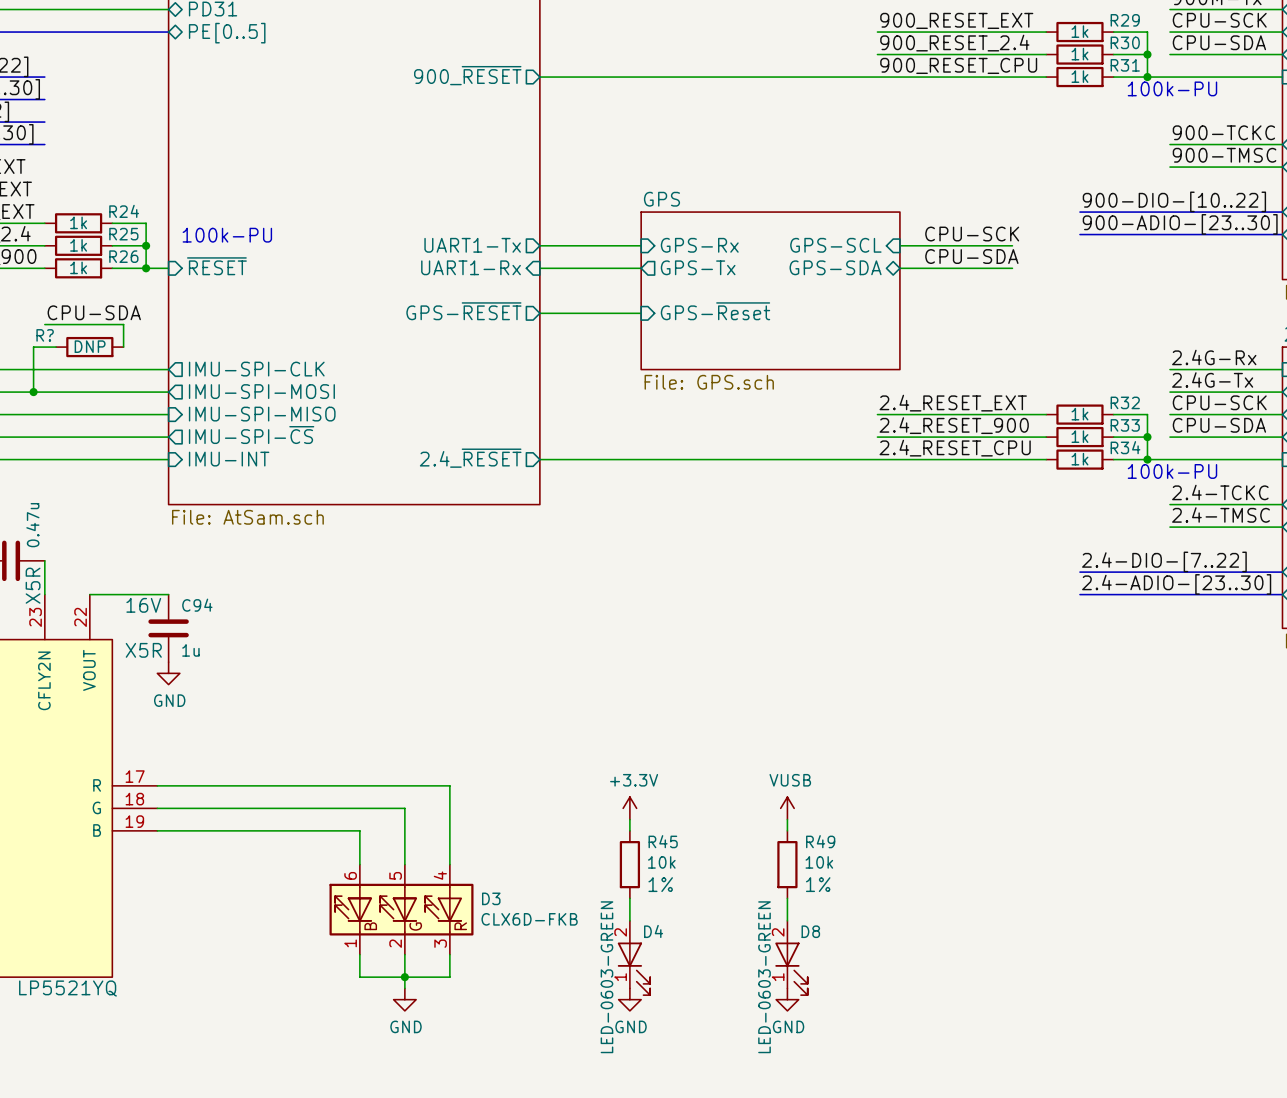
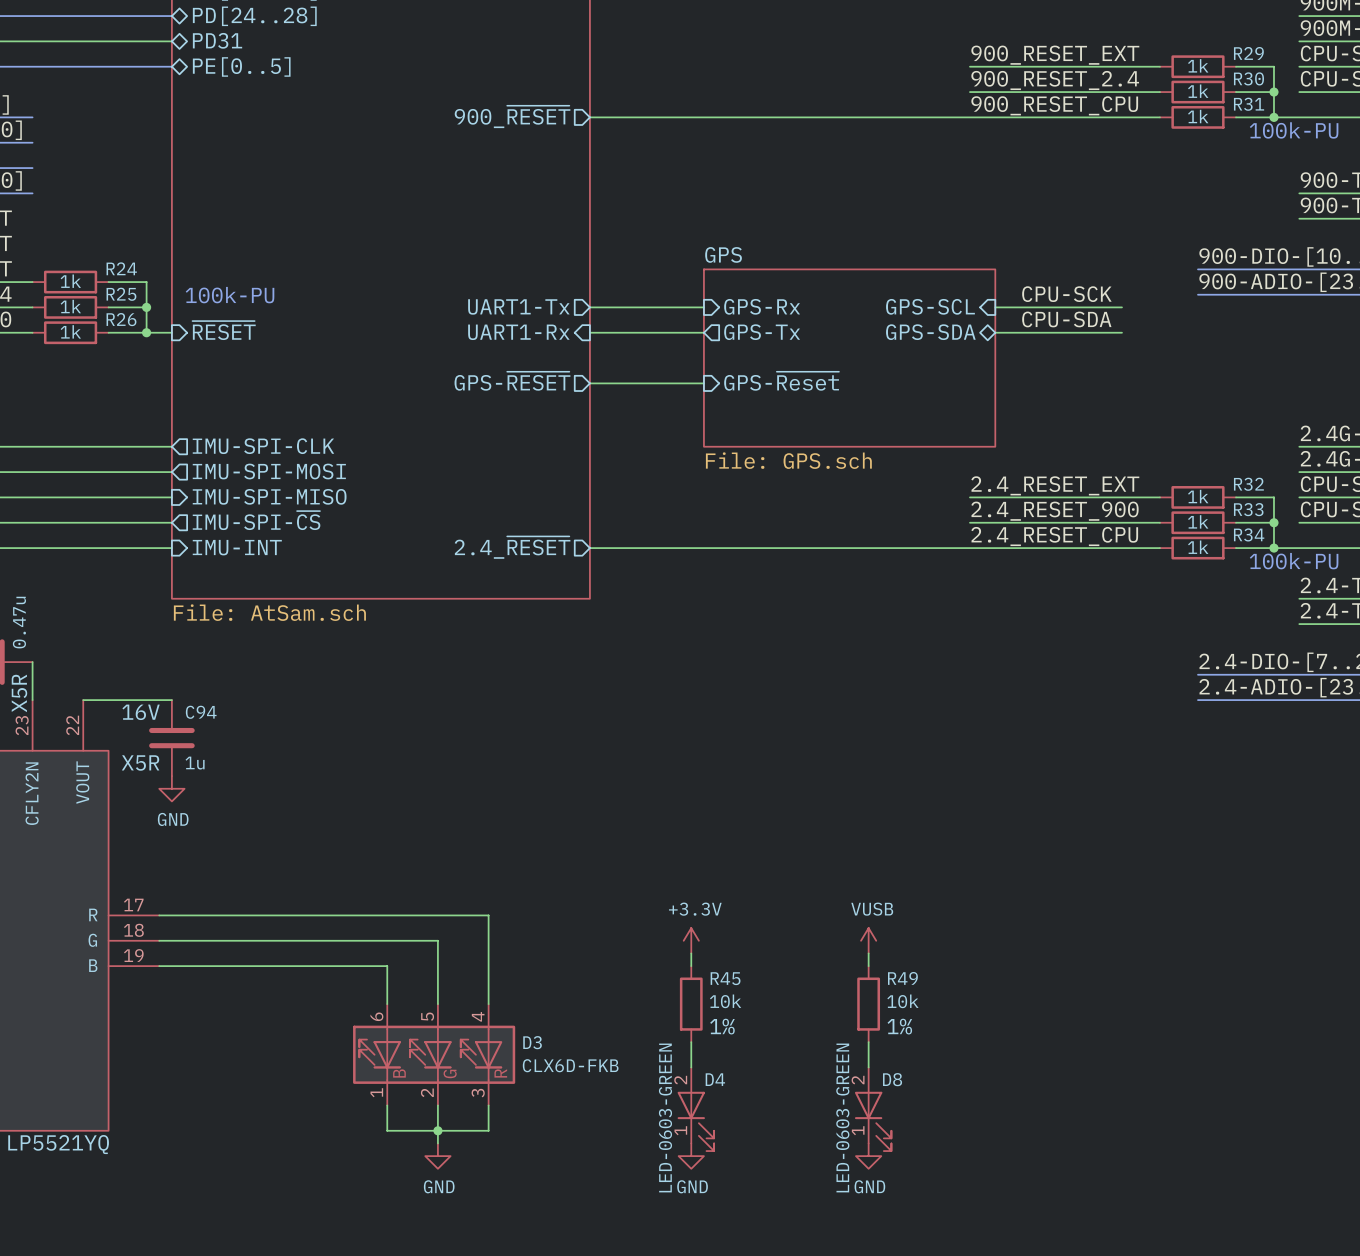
label: CPU-SDA (94, 312) -> none
wire: (44, 324) (123, 324) (123, 347) -> none
wire: (56, 347) (33, 347) (33, 392) -> none
R?: DNP (89, 347) -> none
junction: (33, 392) -> none

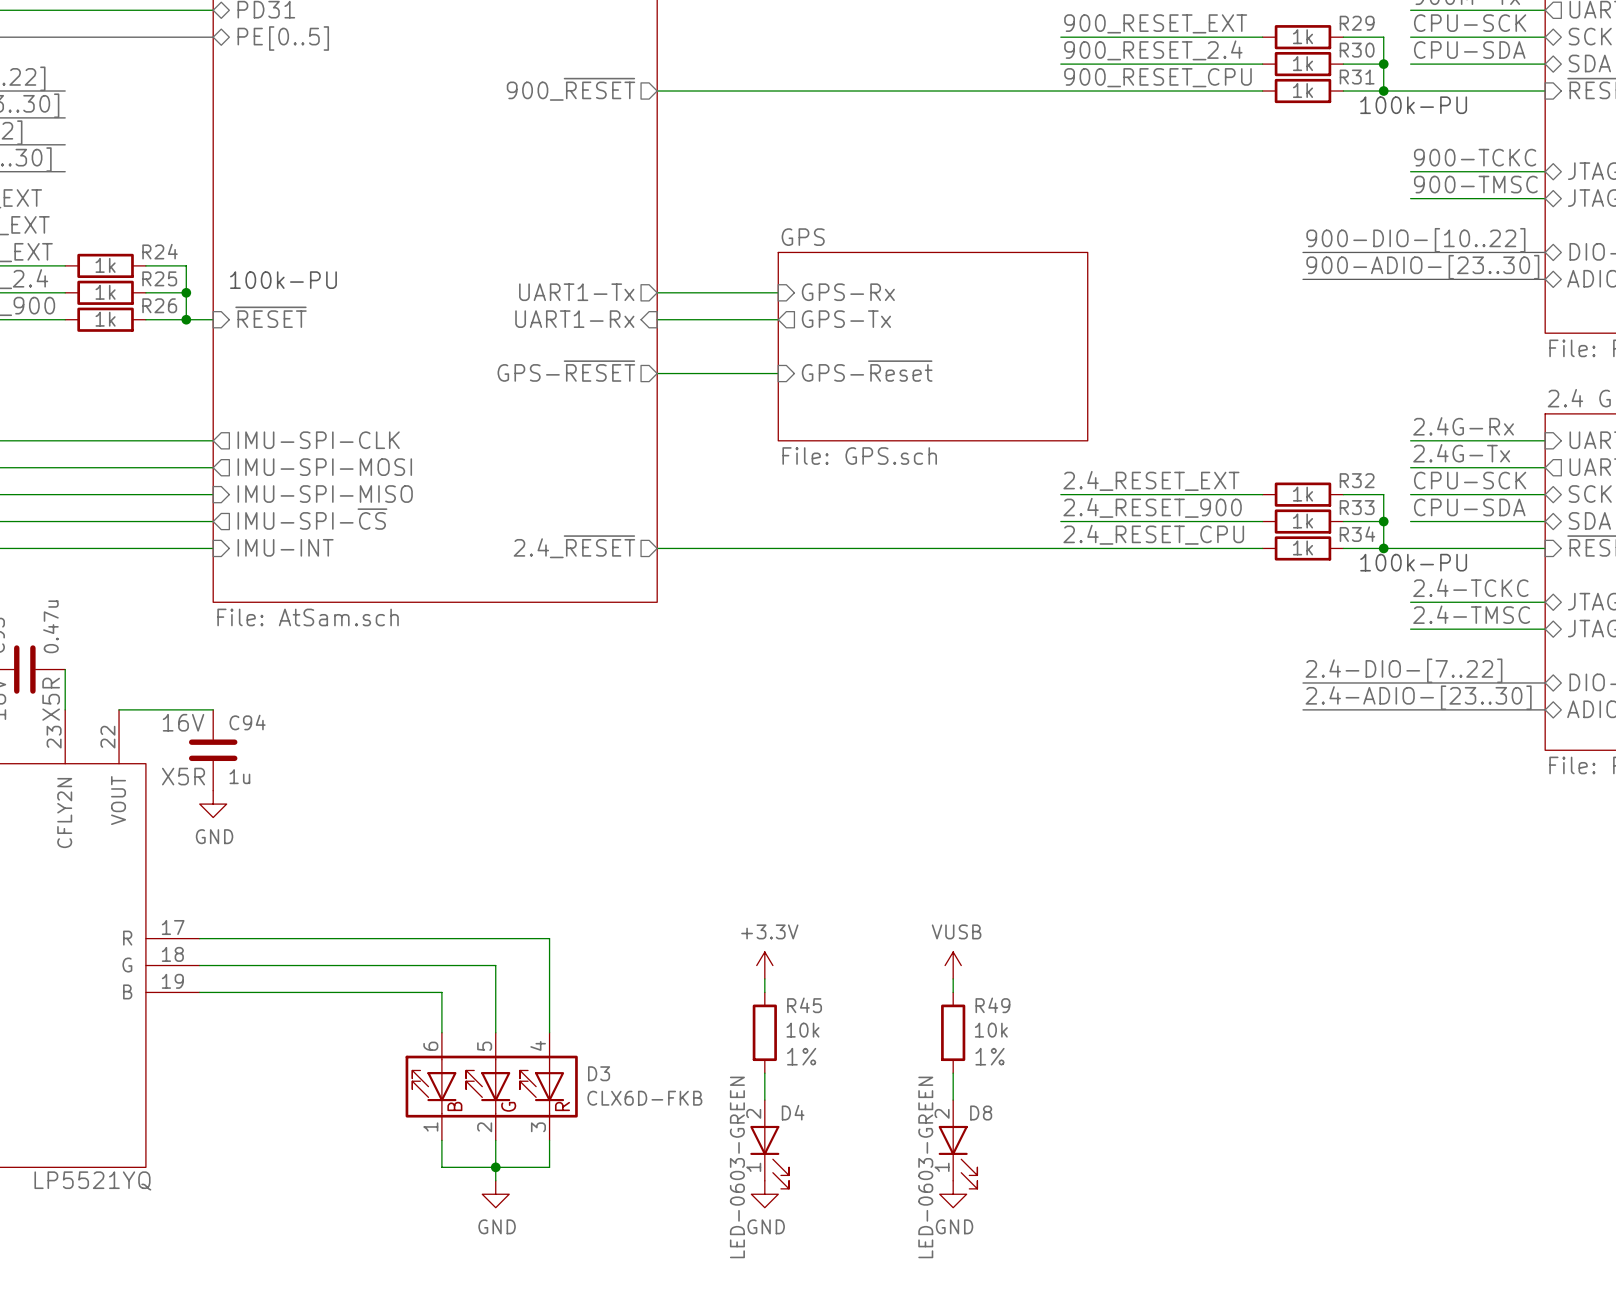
label: CPU-SCK (1066, 294) -> none
sheet pin: GPS-SCL (930, 306) -> none
wire: (995, 307) (1121, 307) -> none
label: CPU-SDA (1066, 319) -> none
sheet pin: GPS-SDA (930, 332) -> none
wire: (995, 332) (1121, 332) -> none

